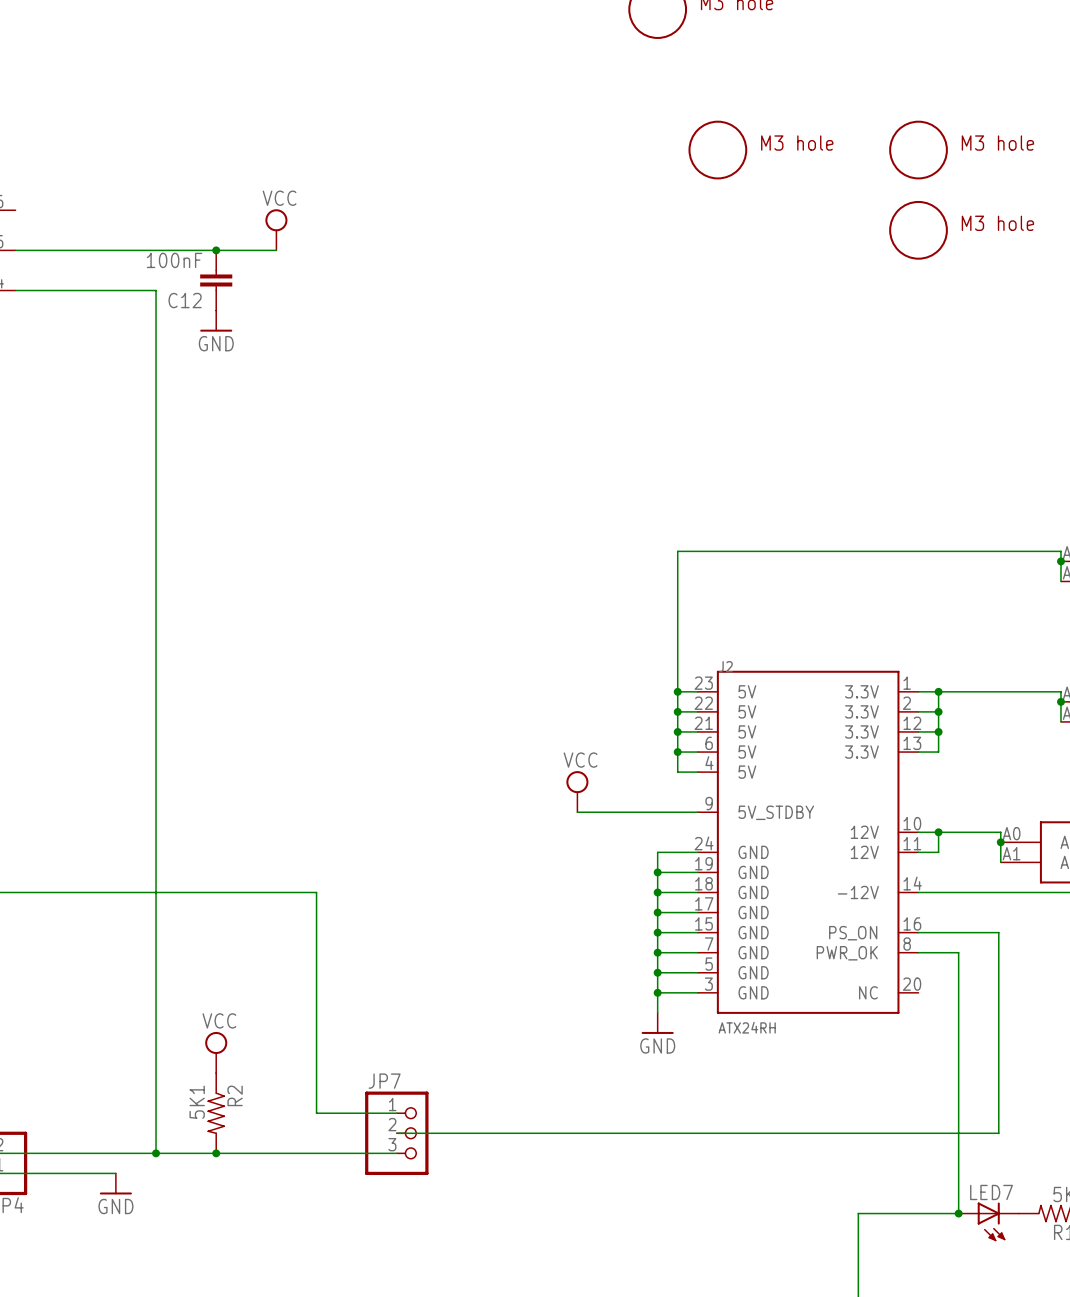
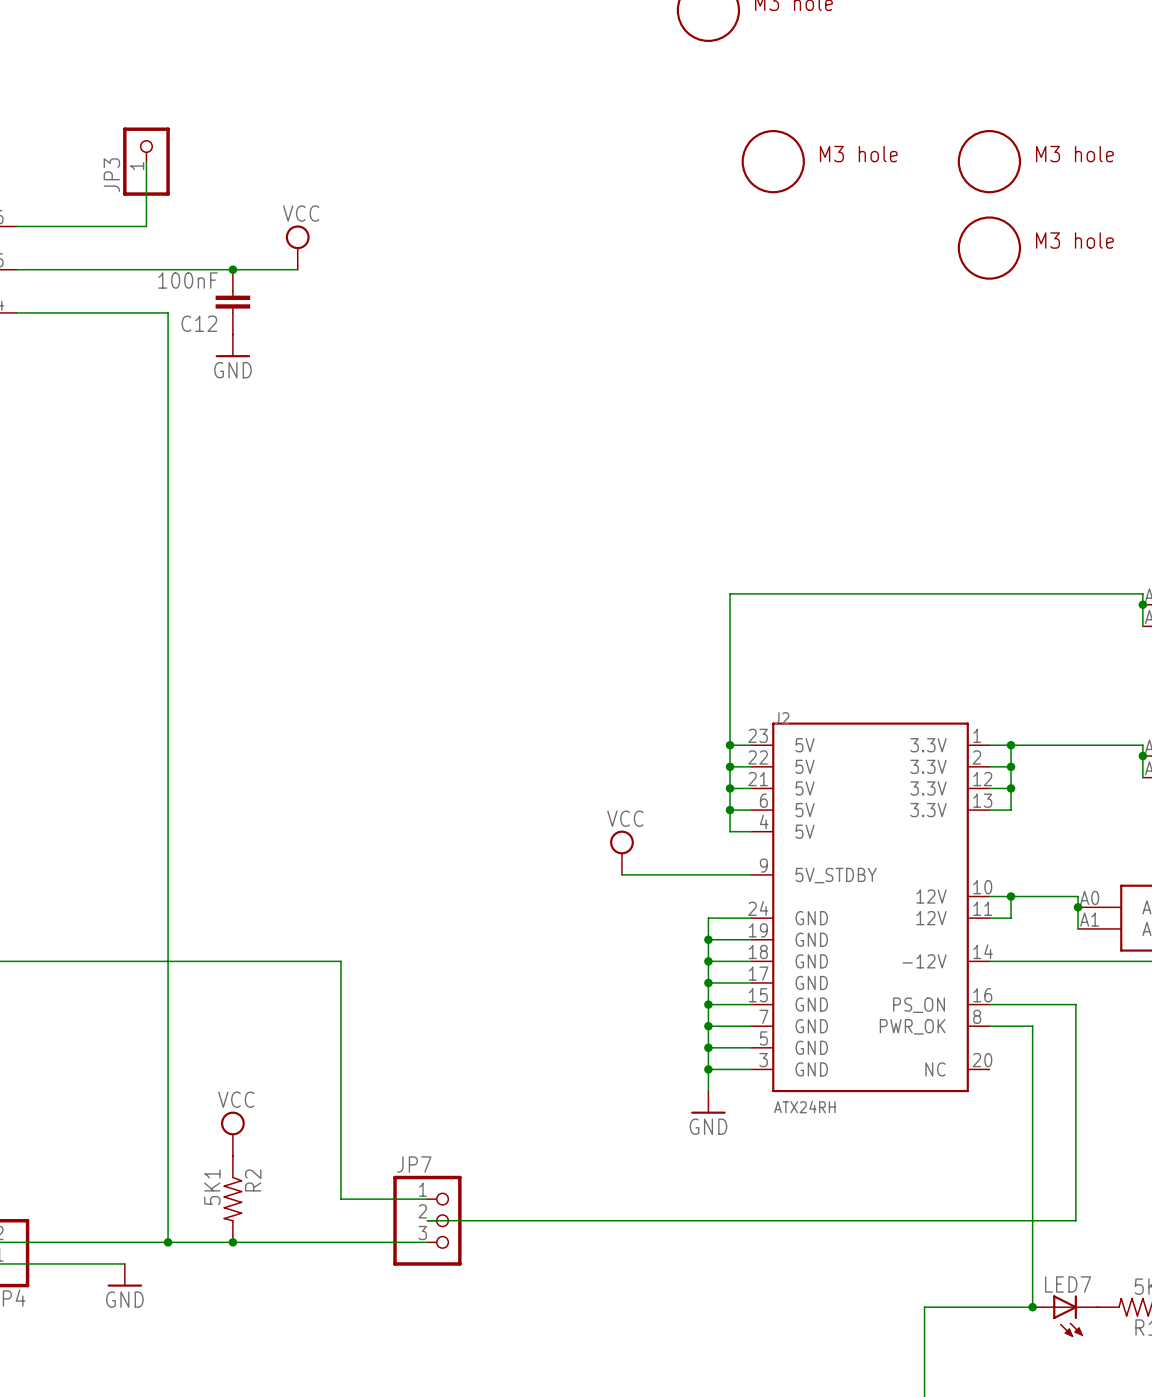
wire: none -> (146, 161) (146, 226) (16, 226)
JP3: none -> (146, 161)

